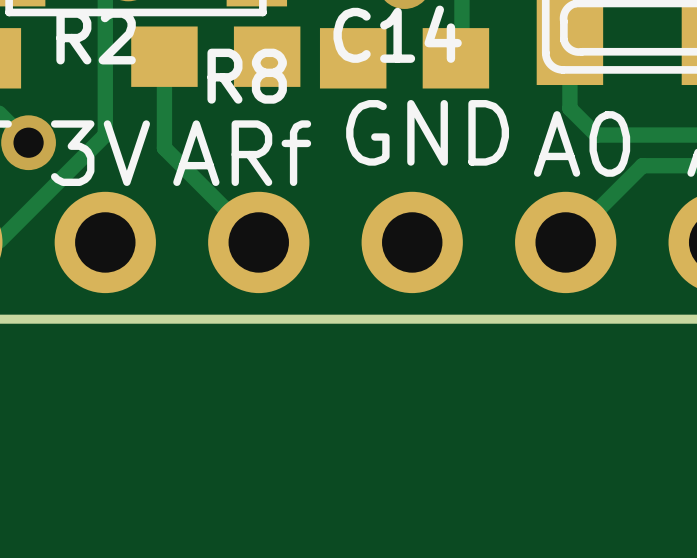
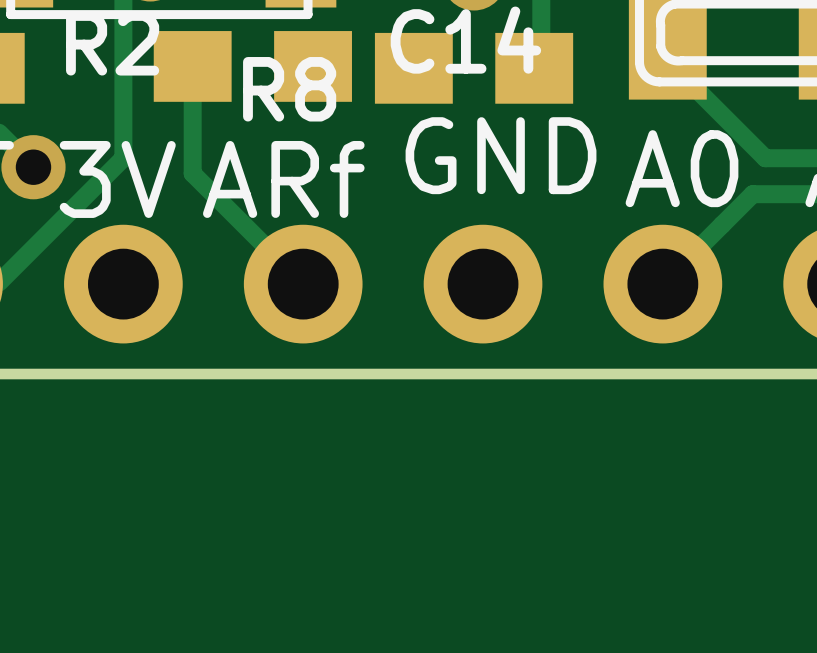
track: (569, 51) (569, 108) (596, 135) (653, 135) -> (667, 60) (765, 158)

